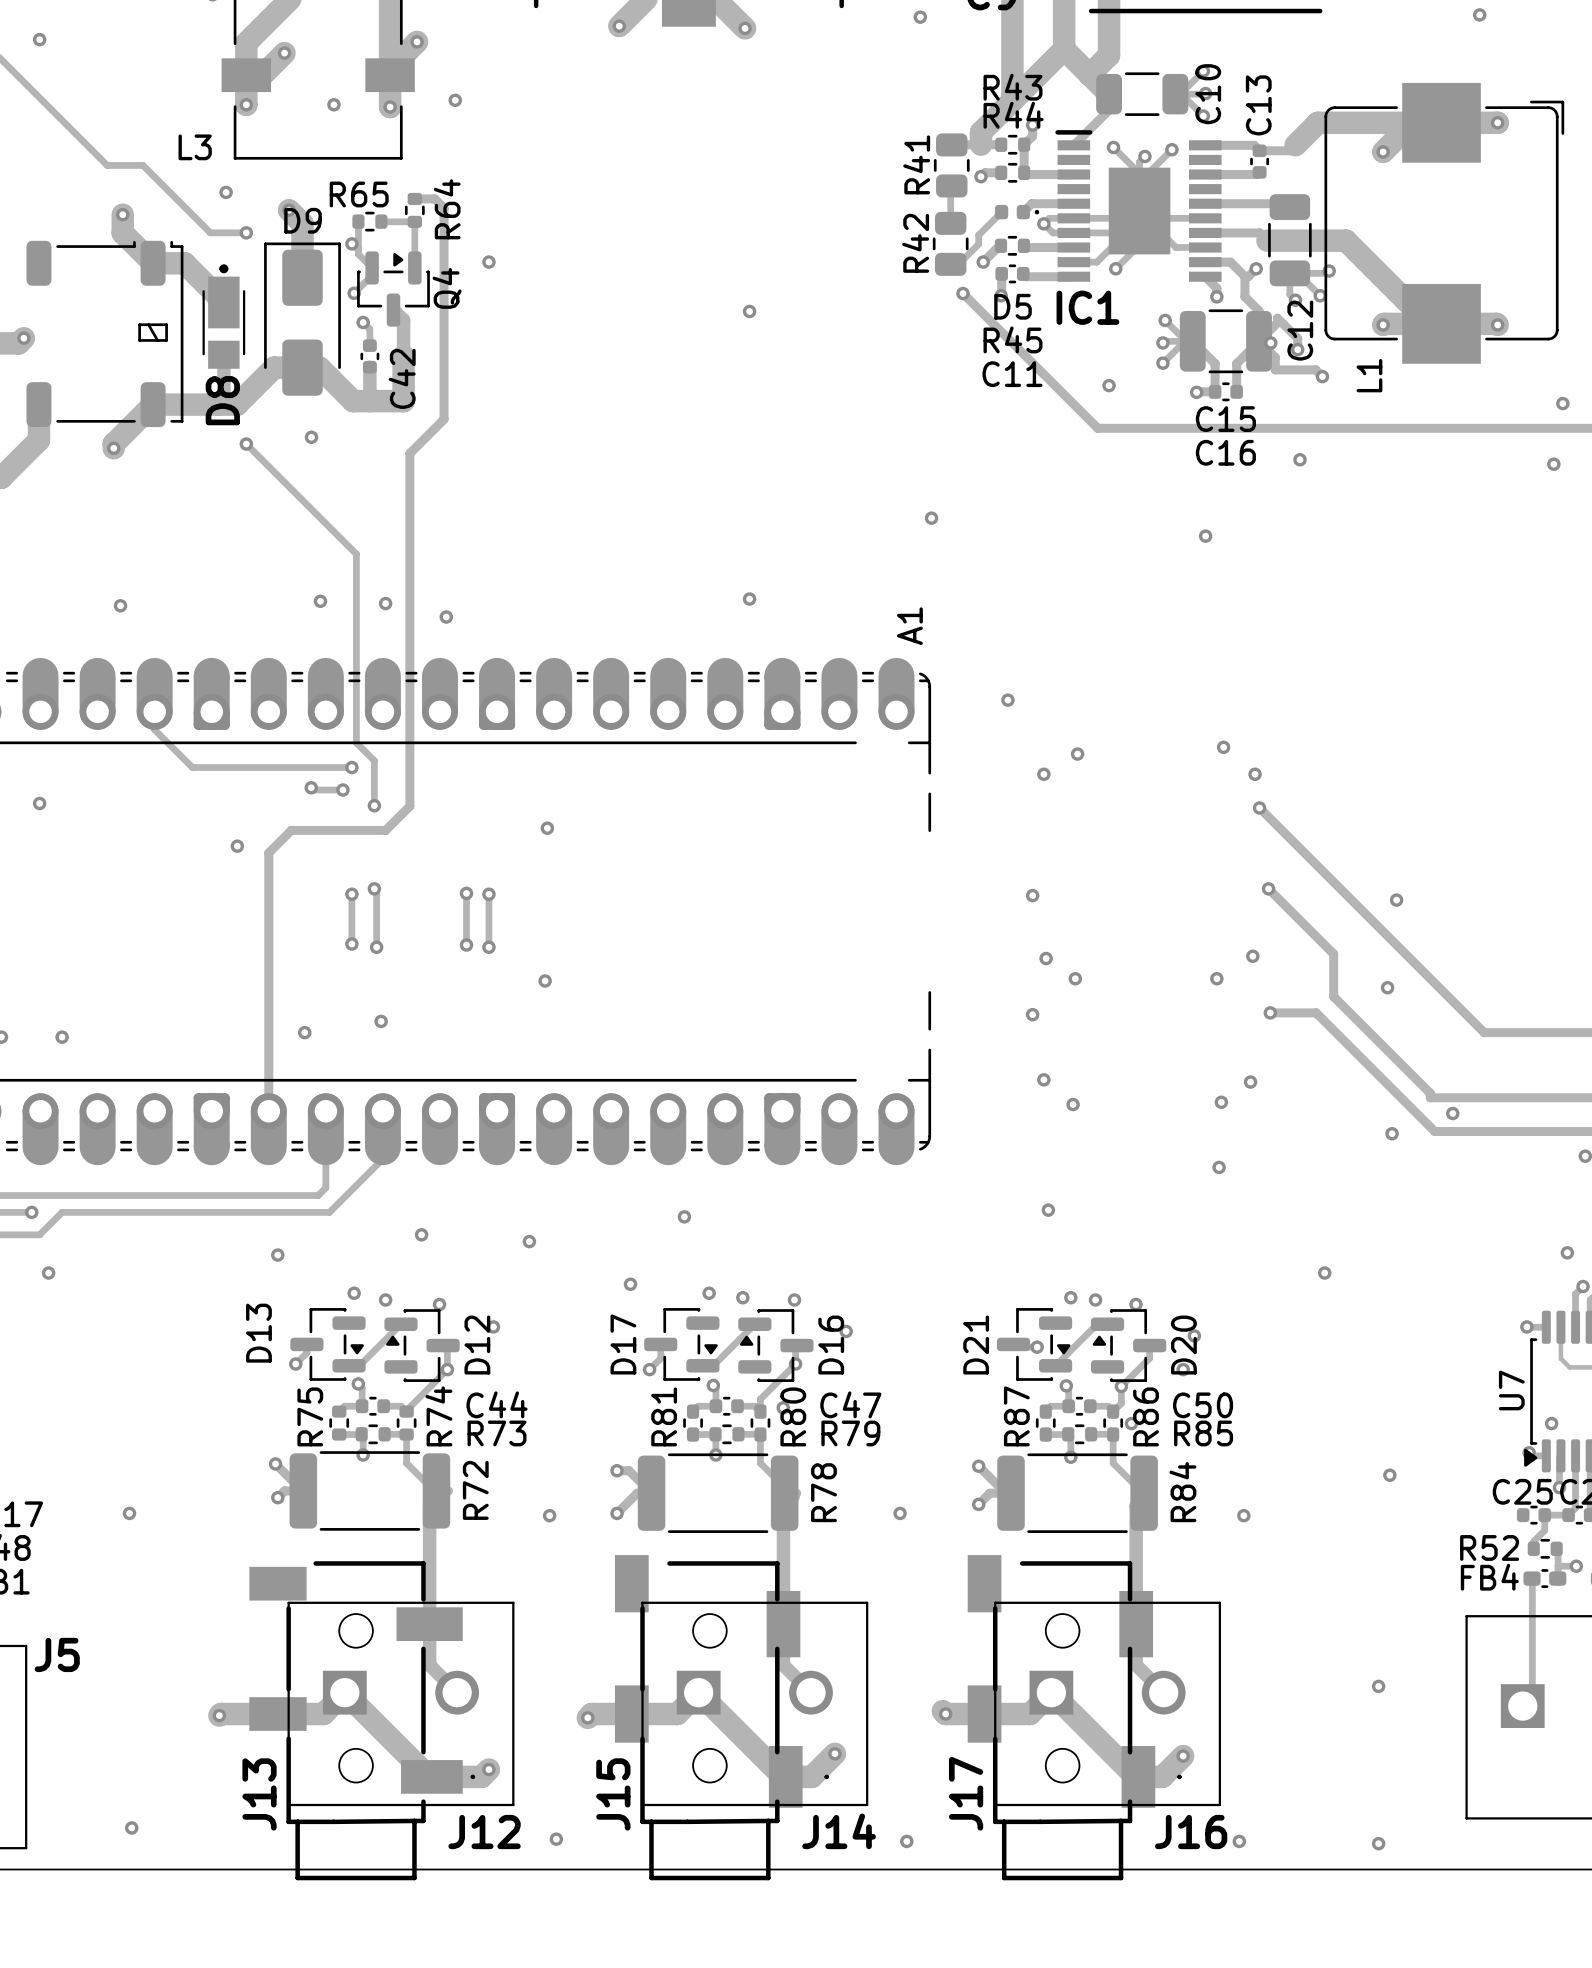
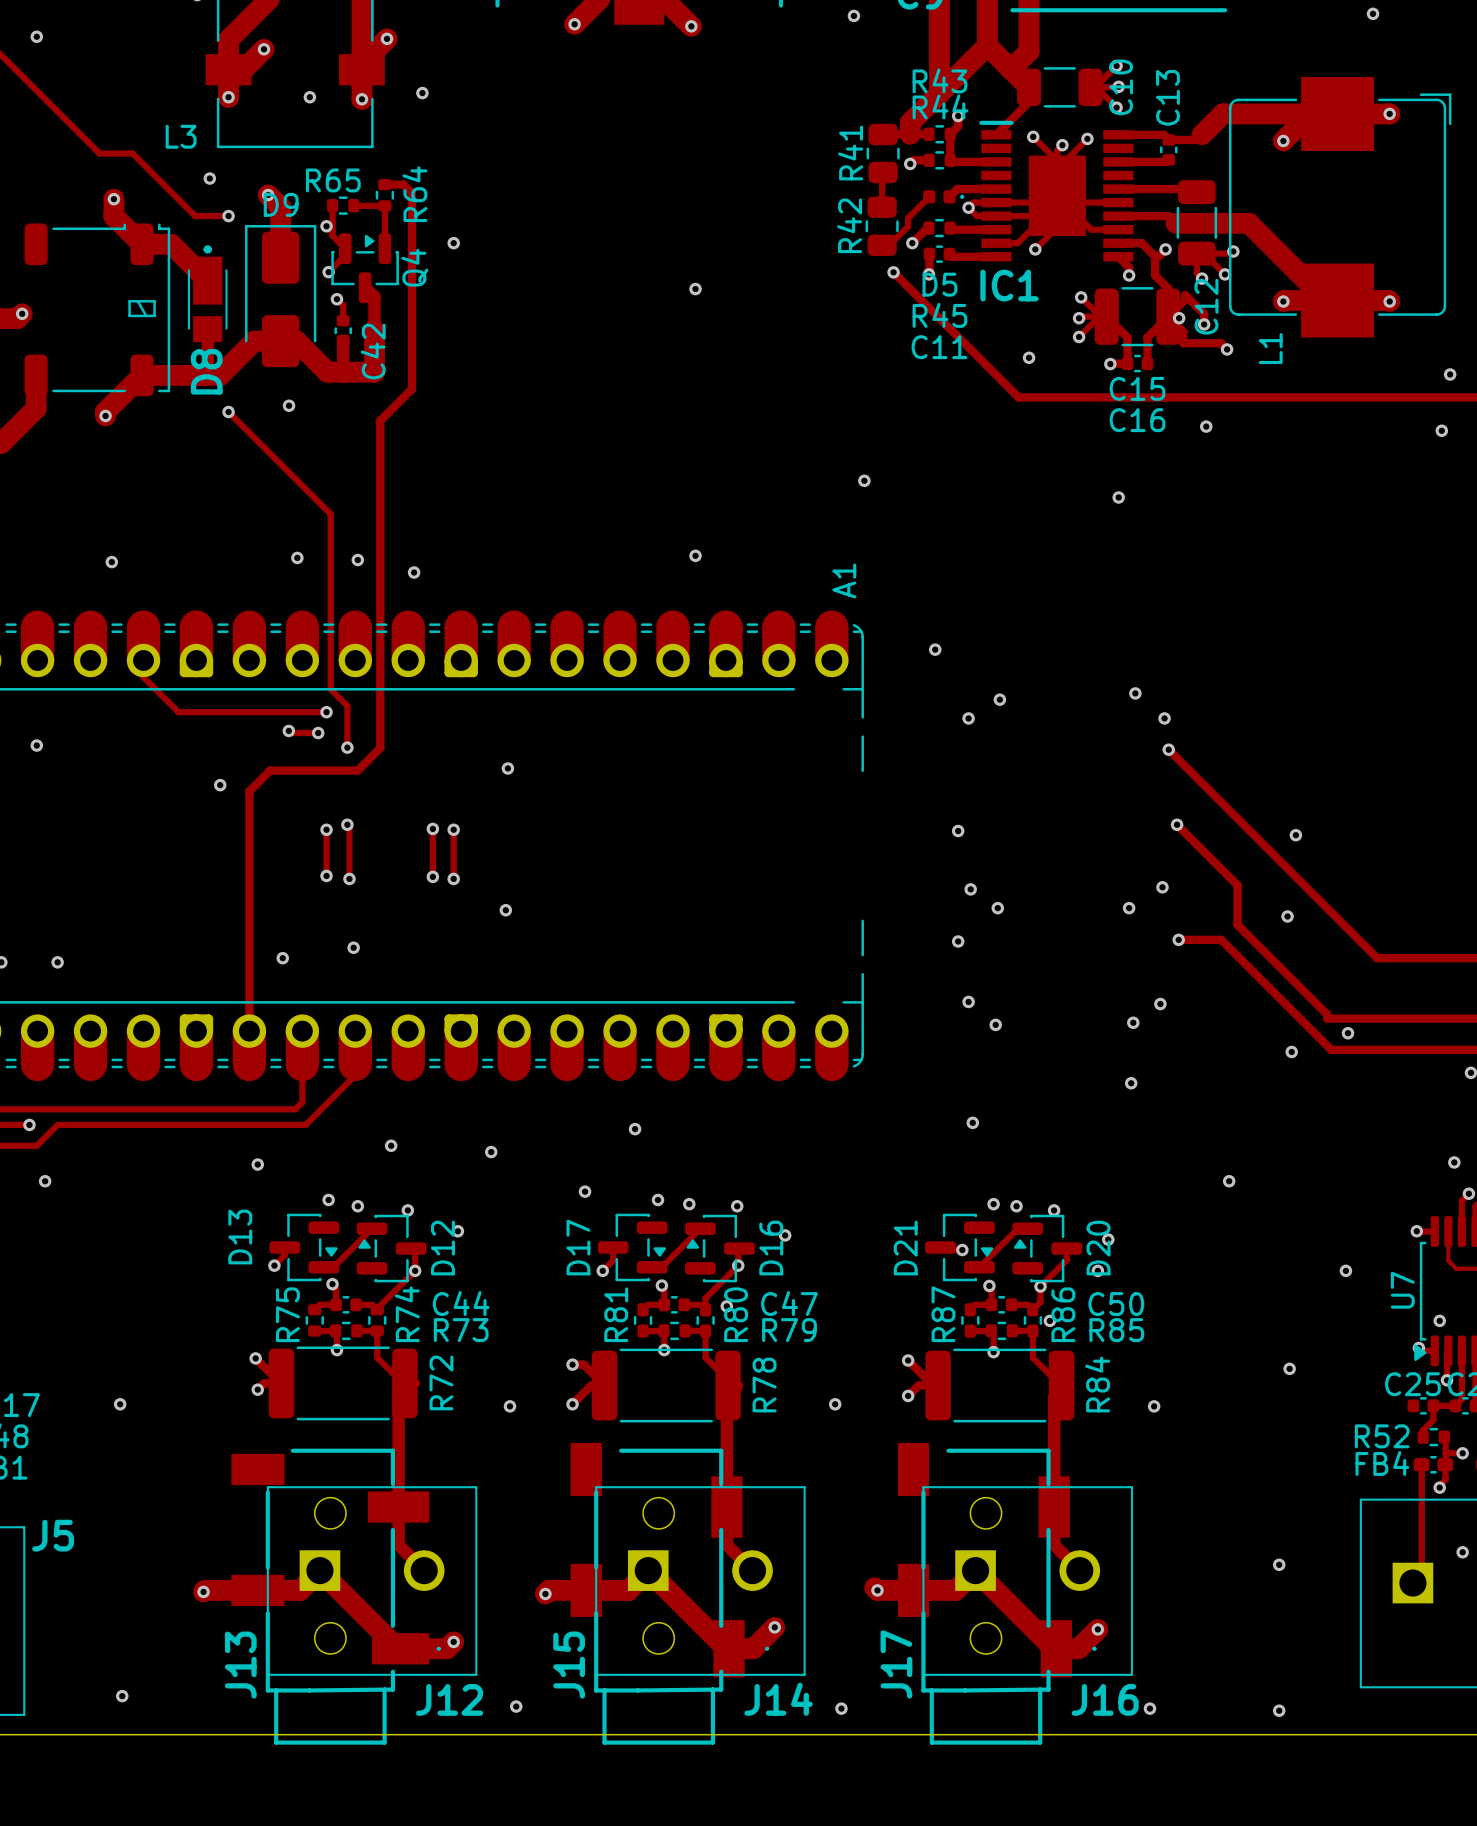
via: none -> (1345, 1270)
track: none -> (1445, 1464) (1445, 1479) (1439, 1487)
via: none -> (1439, 1487)
via: none -> (1462, 1552)

